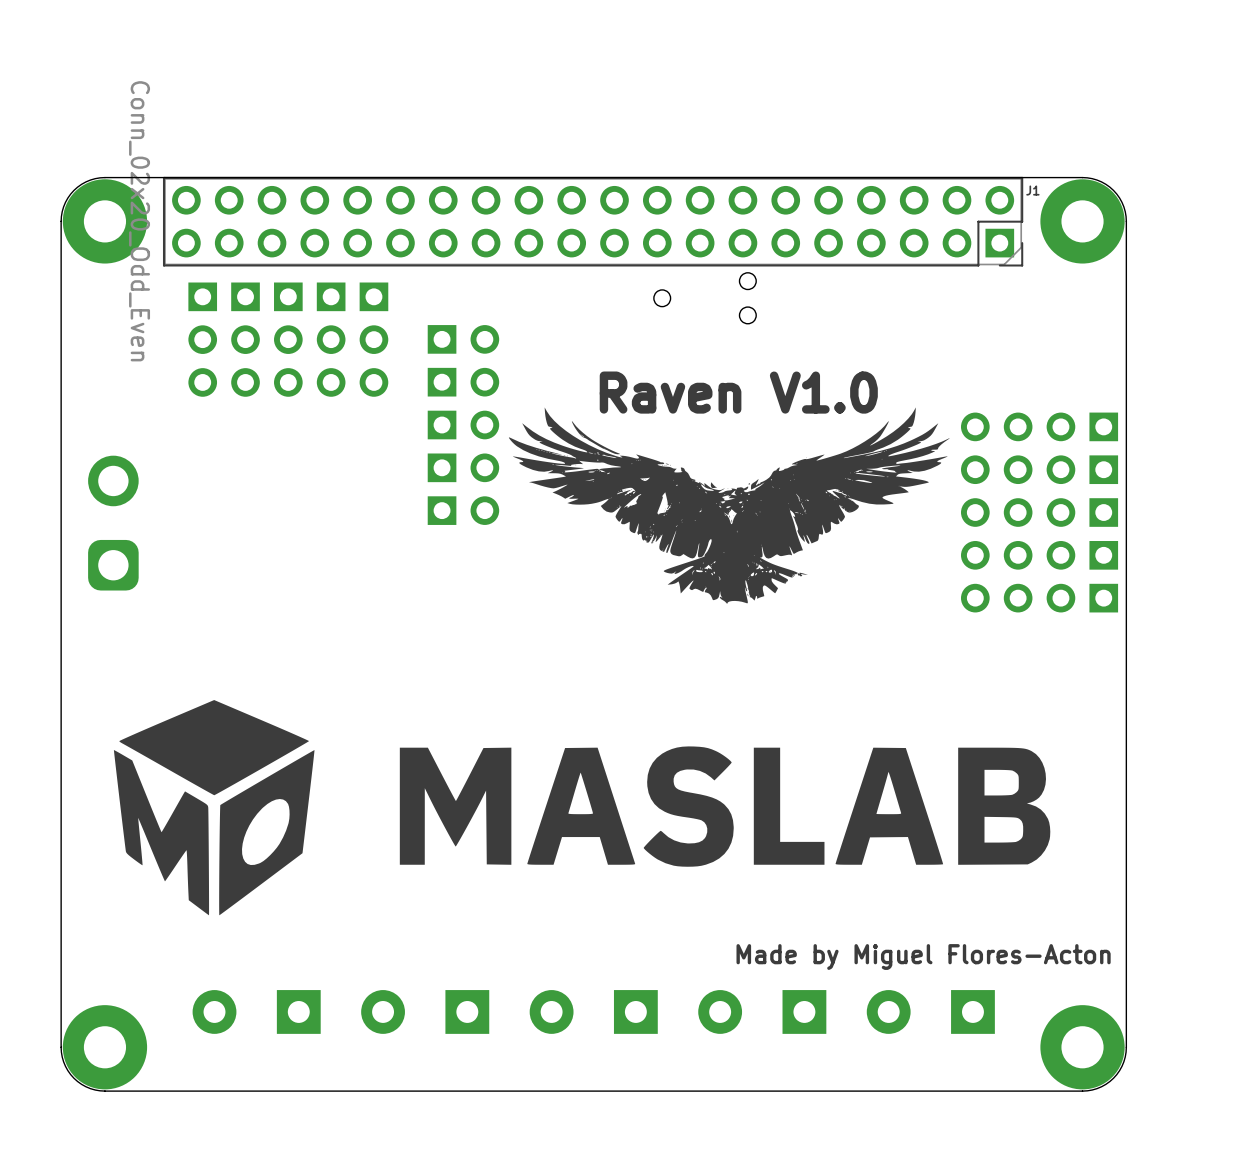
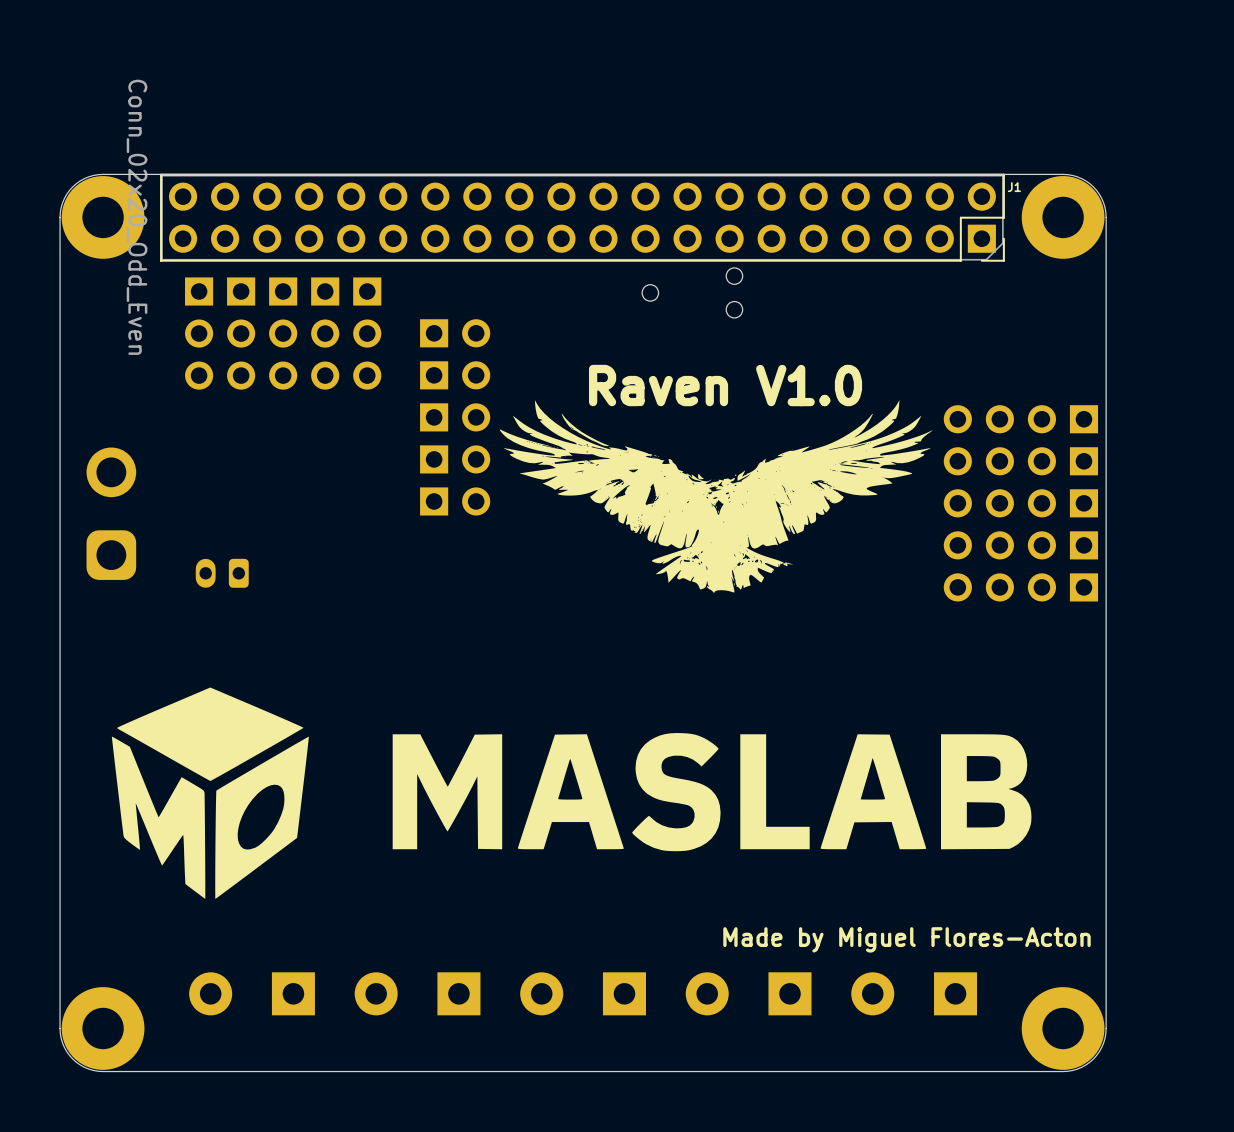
part: none -> (222, 573)

